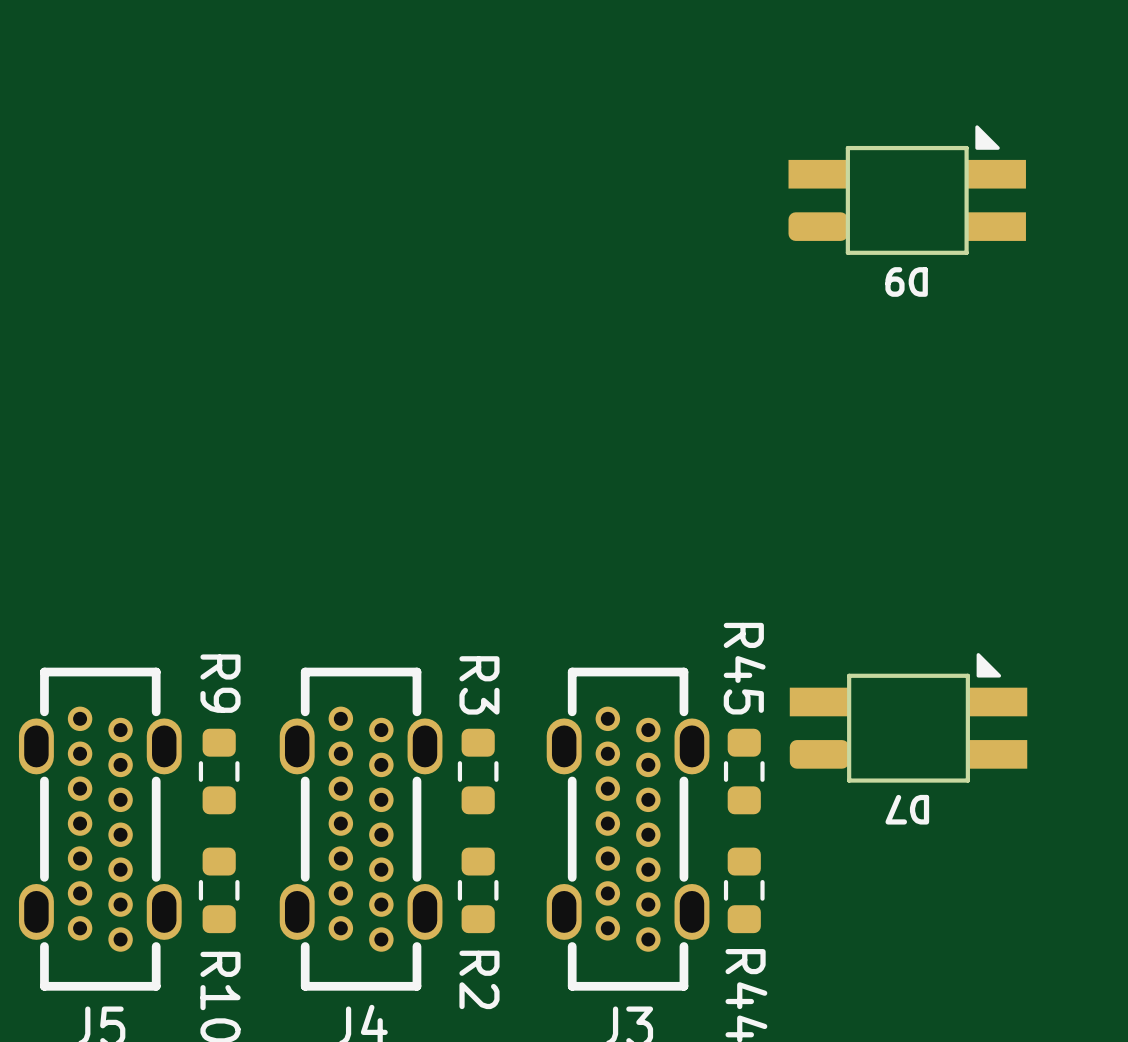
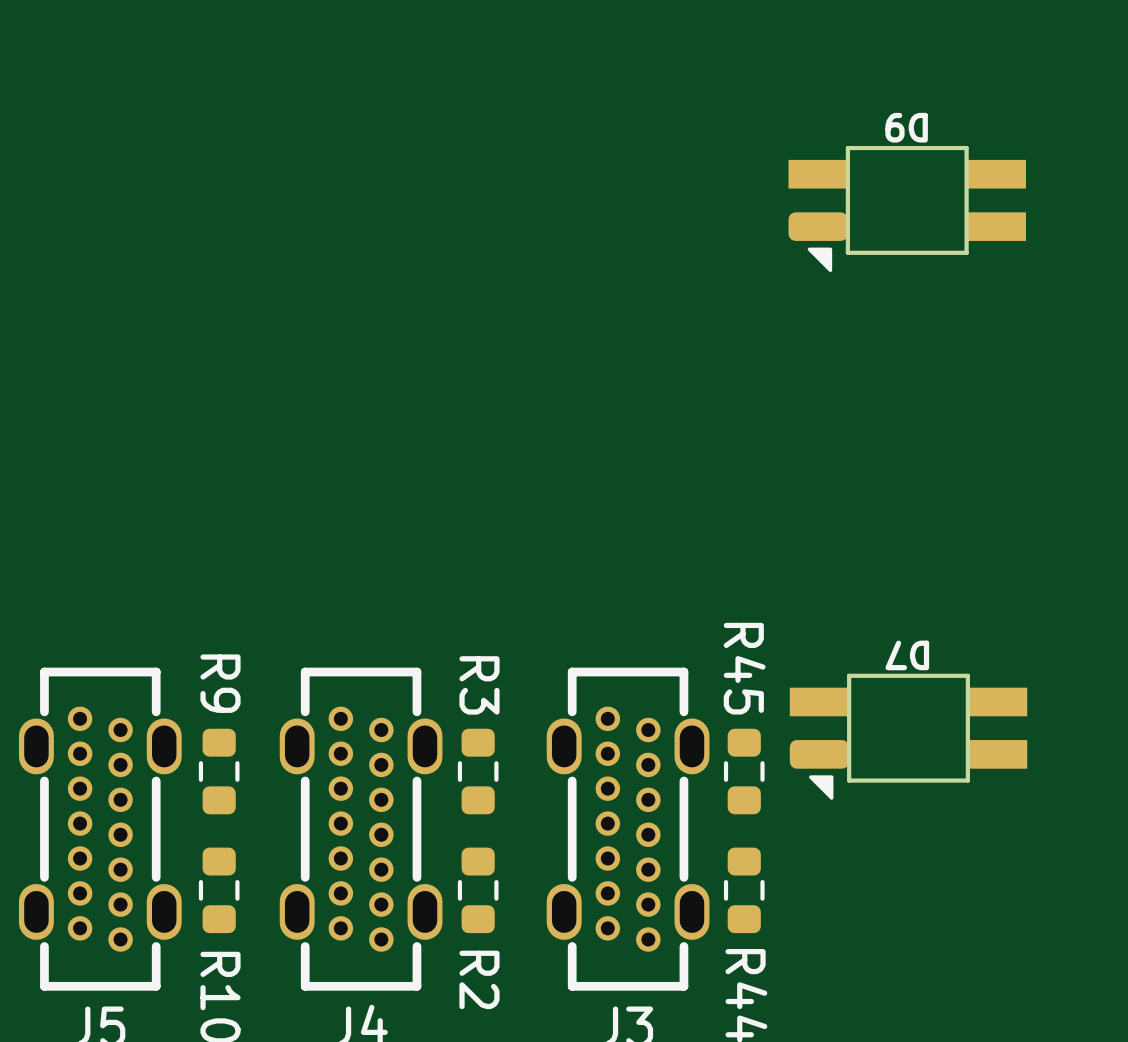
D9 footprint: [788, 125, 1026, 255] -> [788, 145, 1026, 273]
D9 name position: D9 (906, 281) -> D9 (906, 127)
D7 footprint: [789, 653, 1028, 783] -> [789, 673, 1028, 800]
D7 name position: D7 (907, 809) -> D7 (907, 655)

